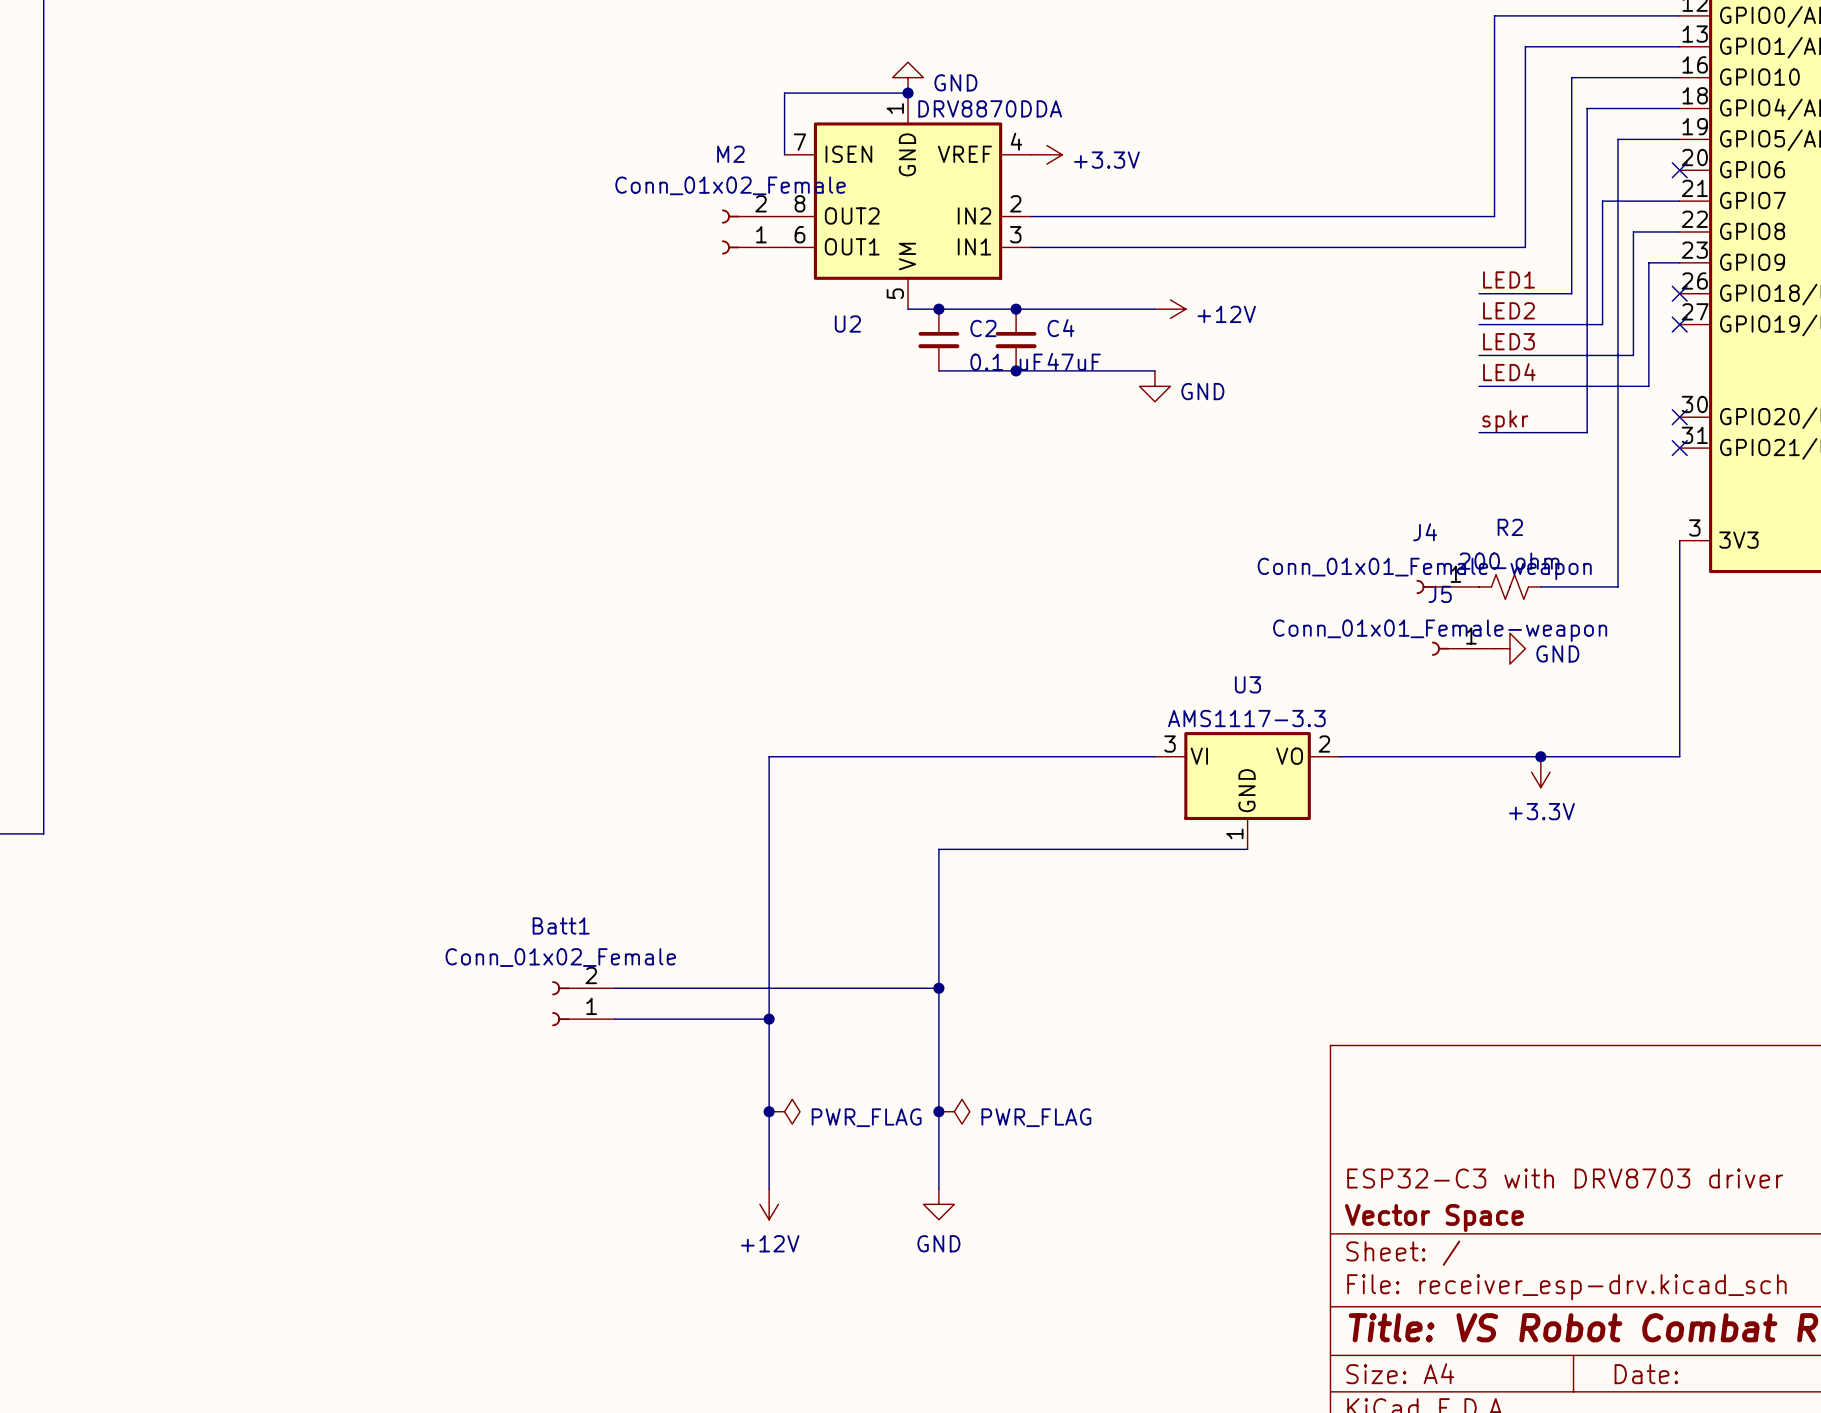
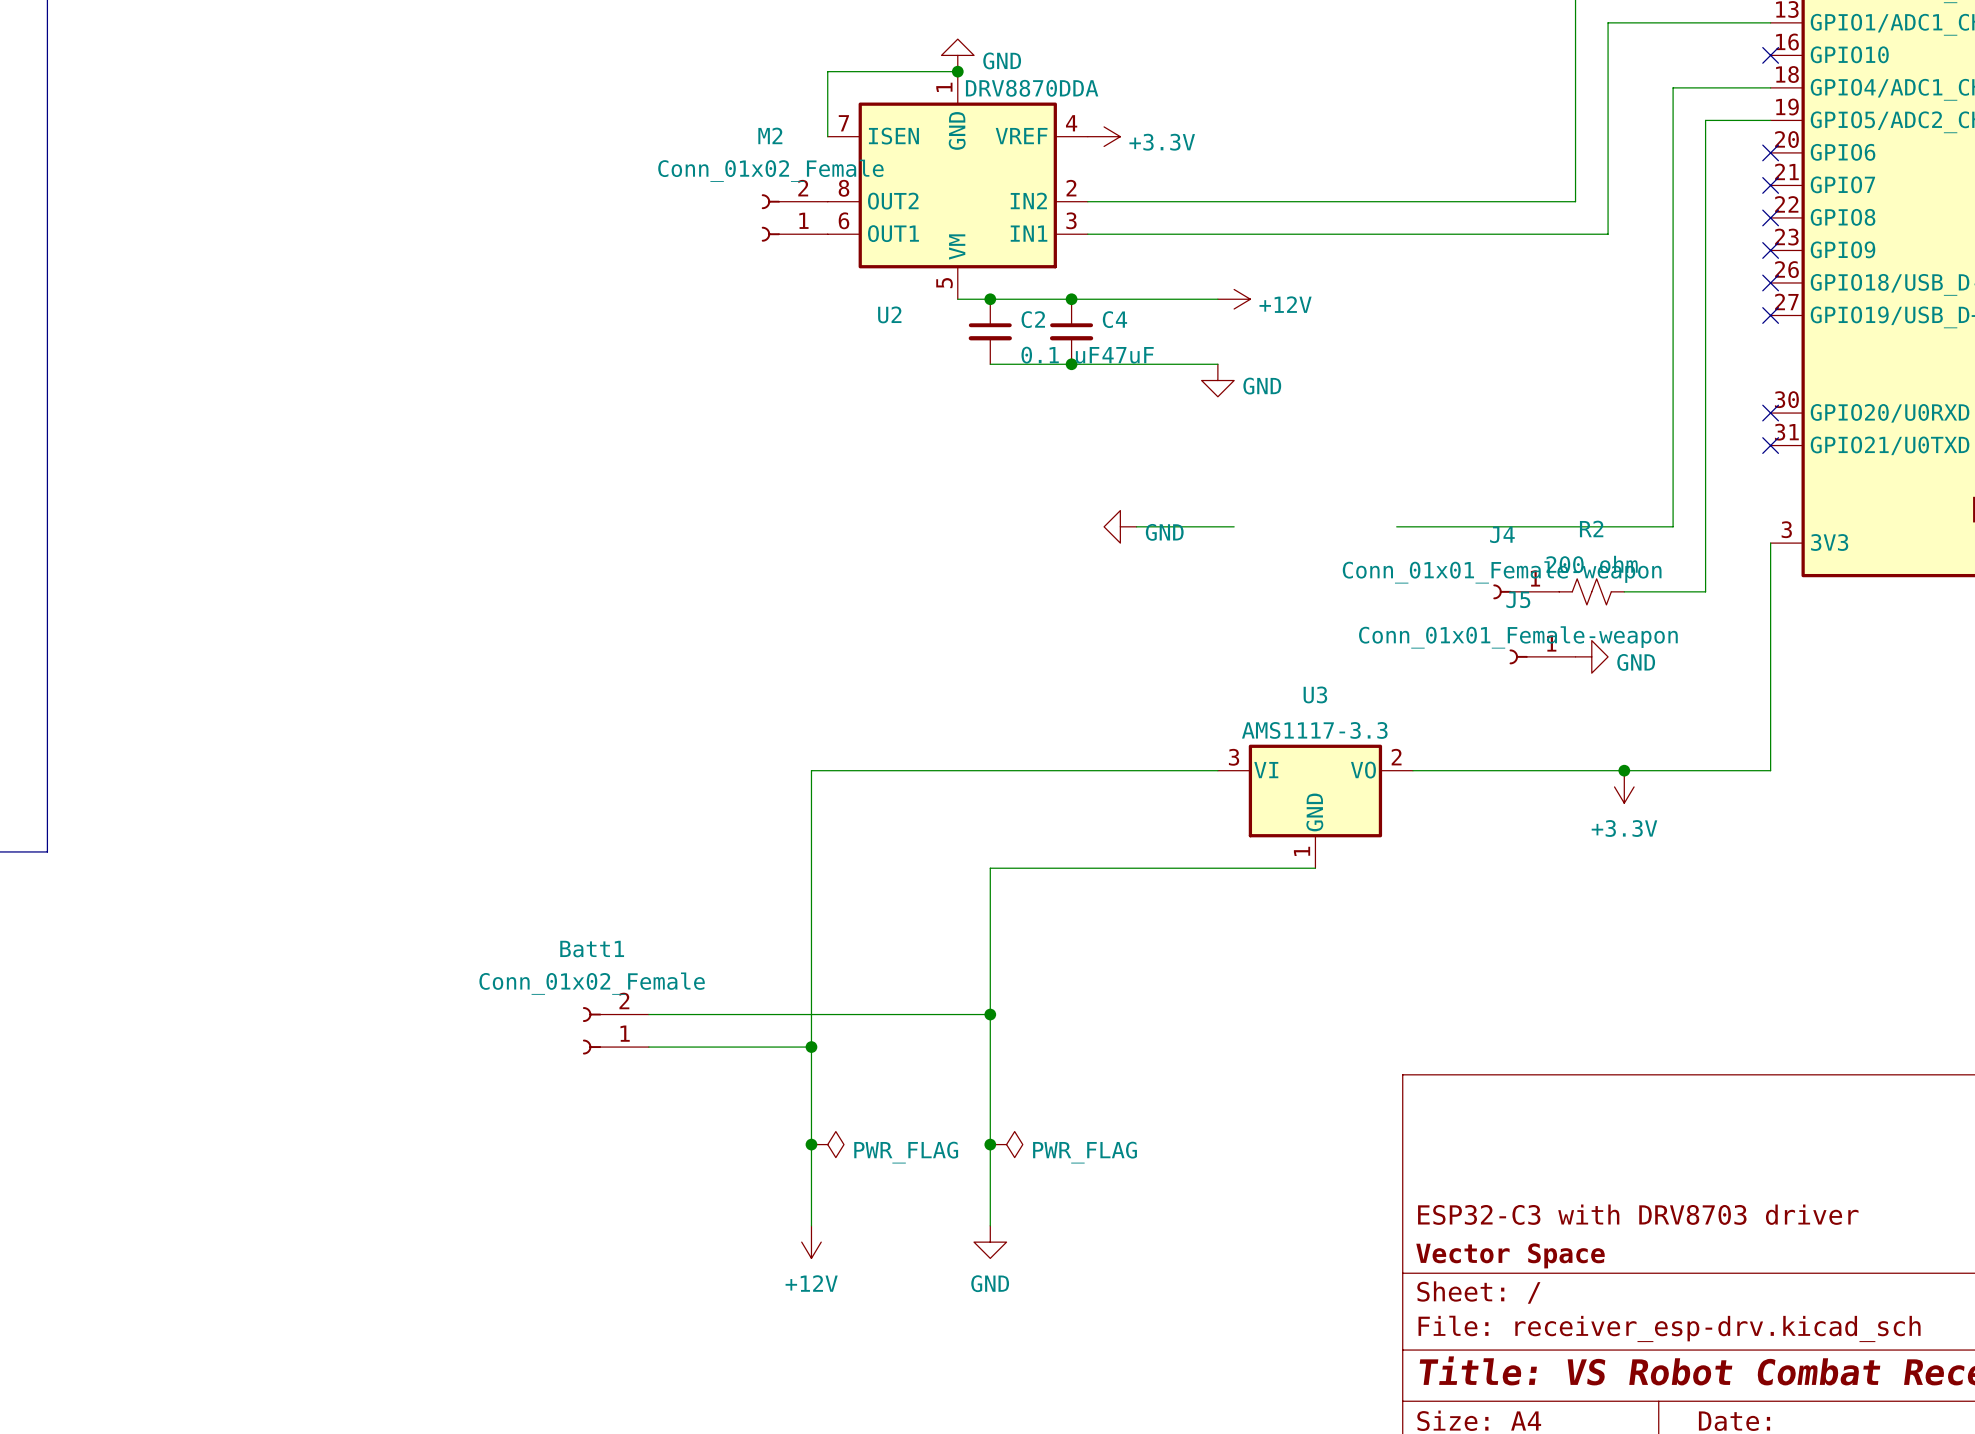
wire: (1679, 77) (1571, 77) (1571, 293) (1479, 293) -> none
no-connect mark: none -> (1770, 55)
wire: (1679, 201) (1602, 201) (1602, 324) (1479, 324) -> none
no-connect mark: none -> (1770, 185)
wire: (1679, 231) (1633, 231) (1633, 355) (1479, 355) -> none
no-connect mark: none -> (1770, 217)
wire: (1679, 262) (1648, 262) (1648, 386) (1479, 386) -> none
no-connect mark: none -> (1770, 250)
label: LED1 (1508, 279) -> none
label: LED2 (1508, 310) -> none
label: LED3 (1508, 341) -> none
label: LED4 (1509, 372) -> none
label: spkr (1505, 421) -> none
wire: (1479, 432) (1587, 432) -> (1396, 526) (1673, 526) (1673, 429)
power symbol: none -> GND (1120, 526)
wire: none -> (1136, 526) (1234, 526)

